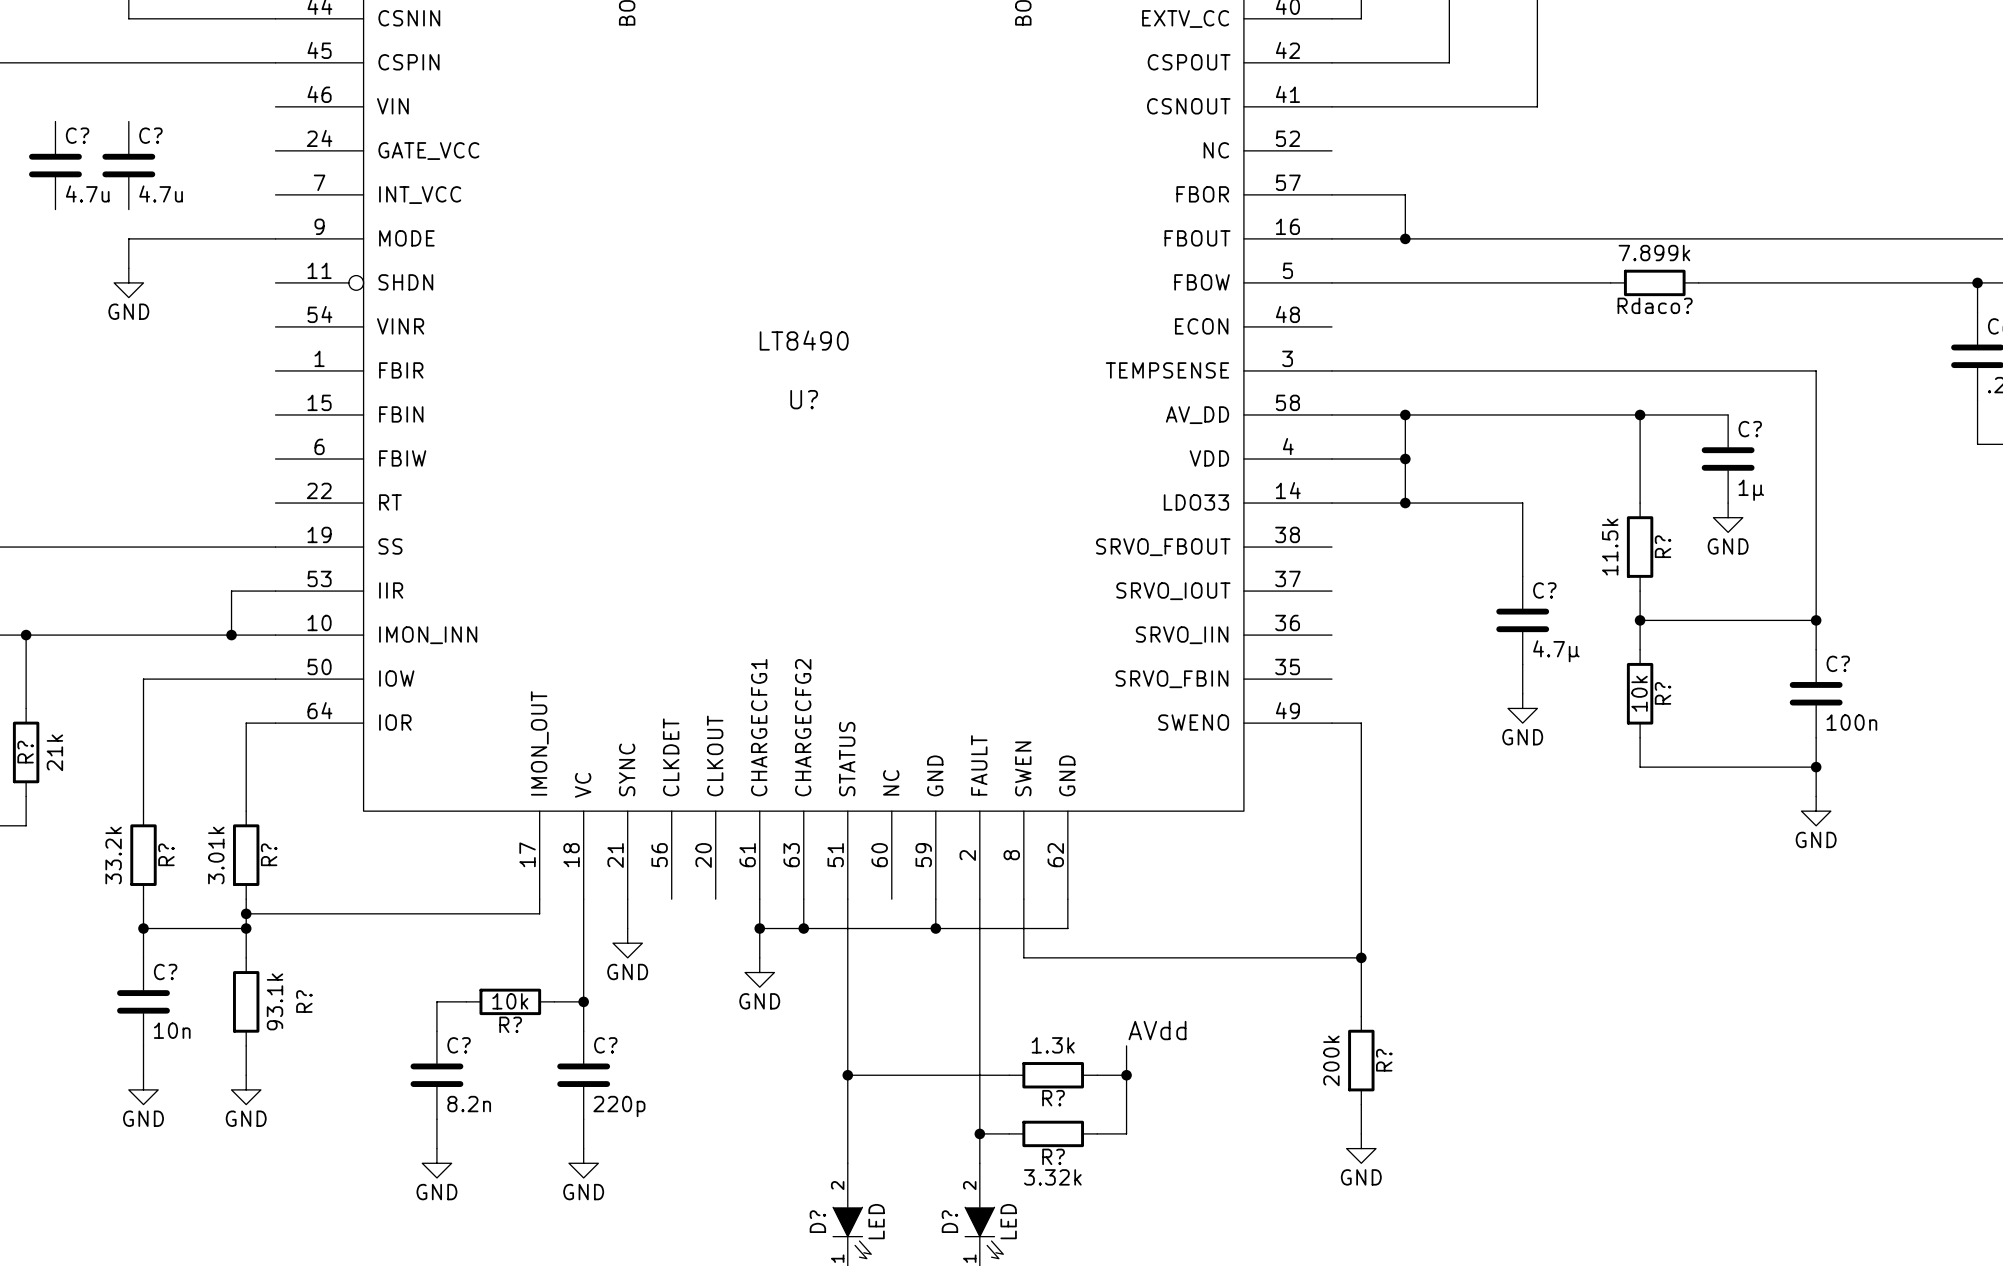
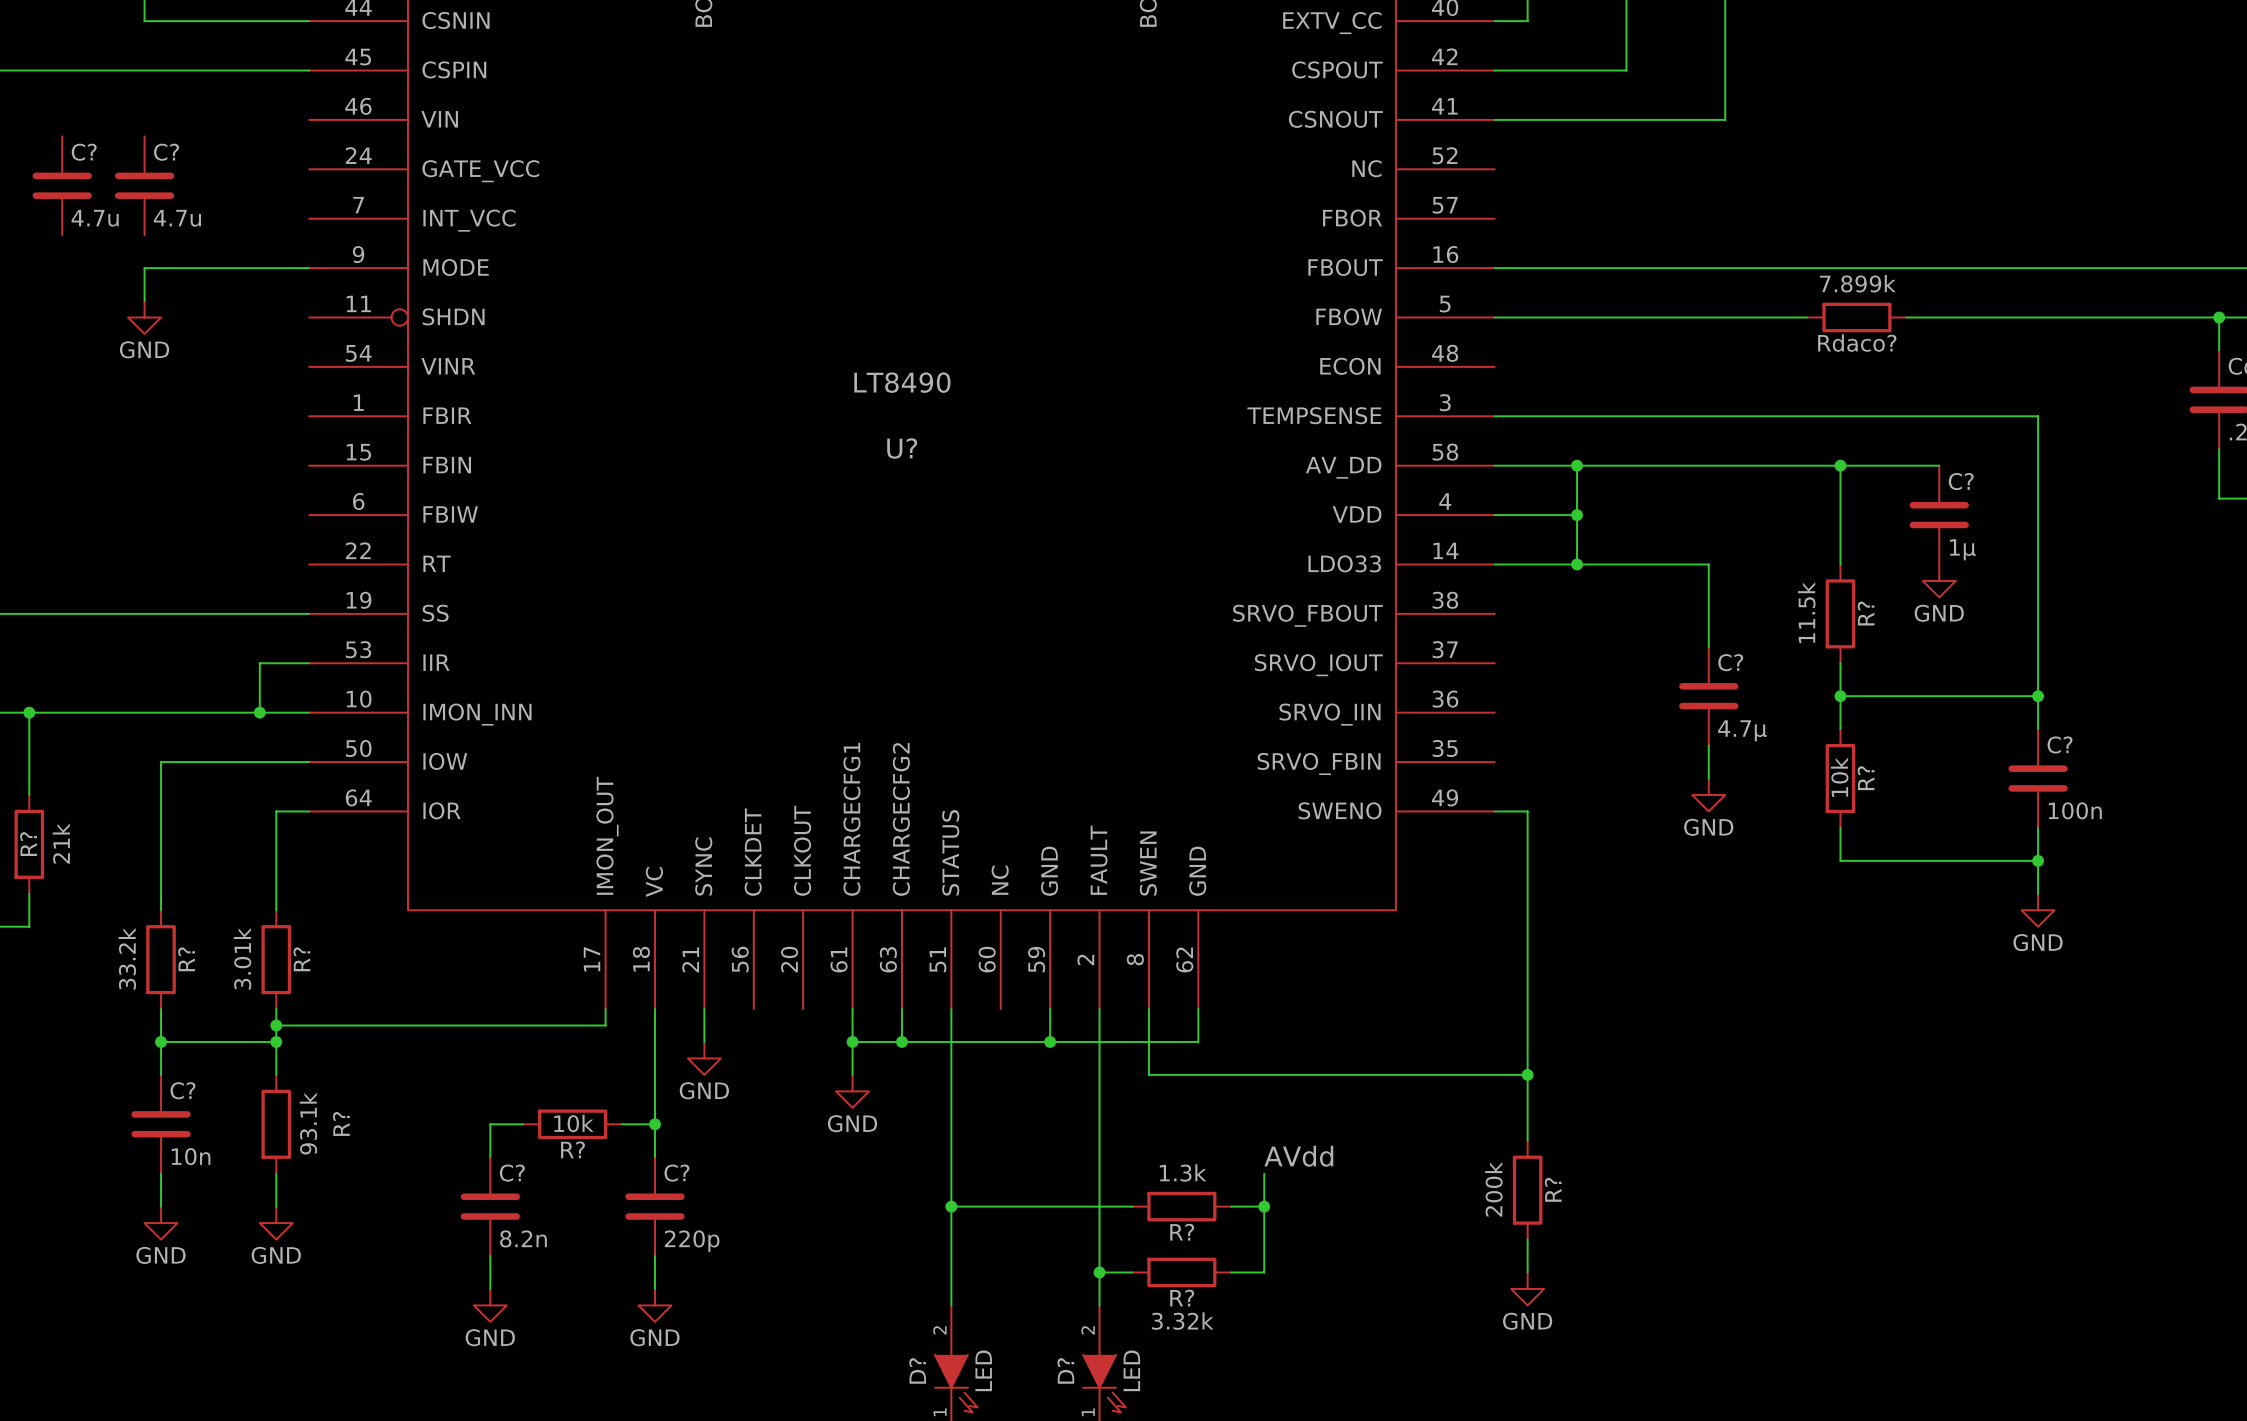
wire: (1331, 194) (1405, 194) (1405, 238) -> none
junction: (1405, 238) -> none

